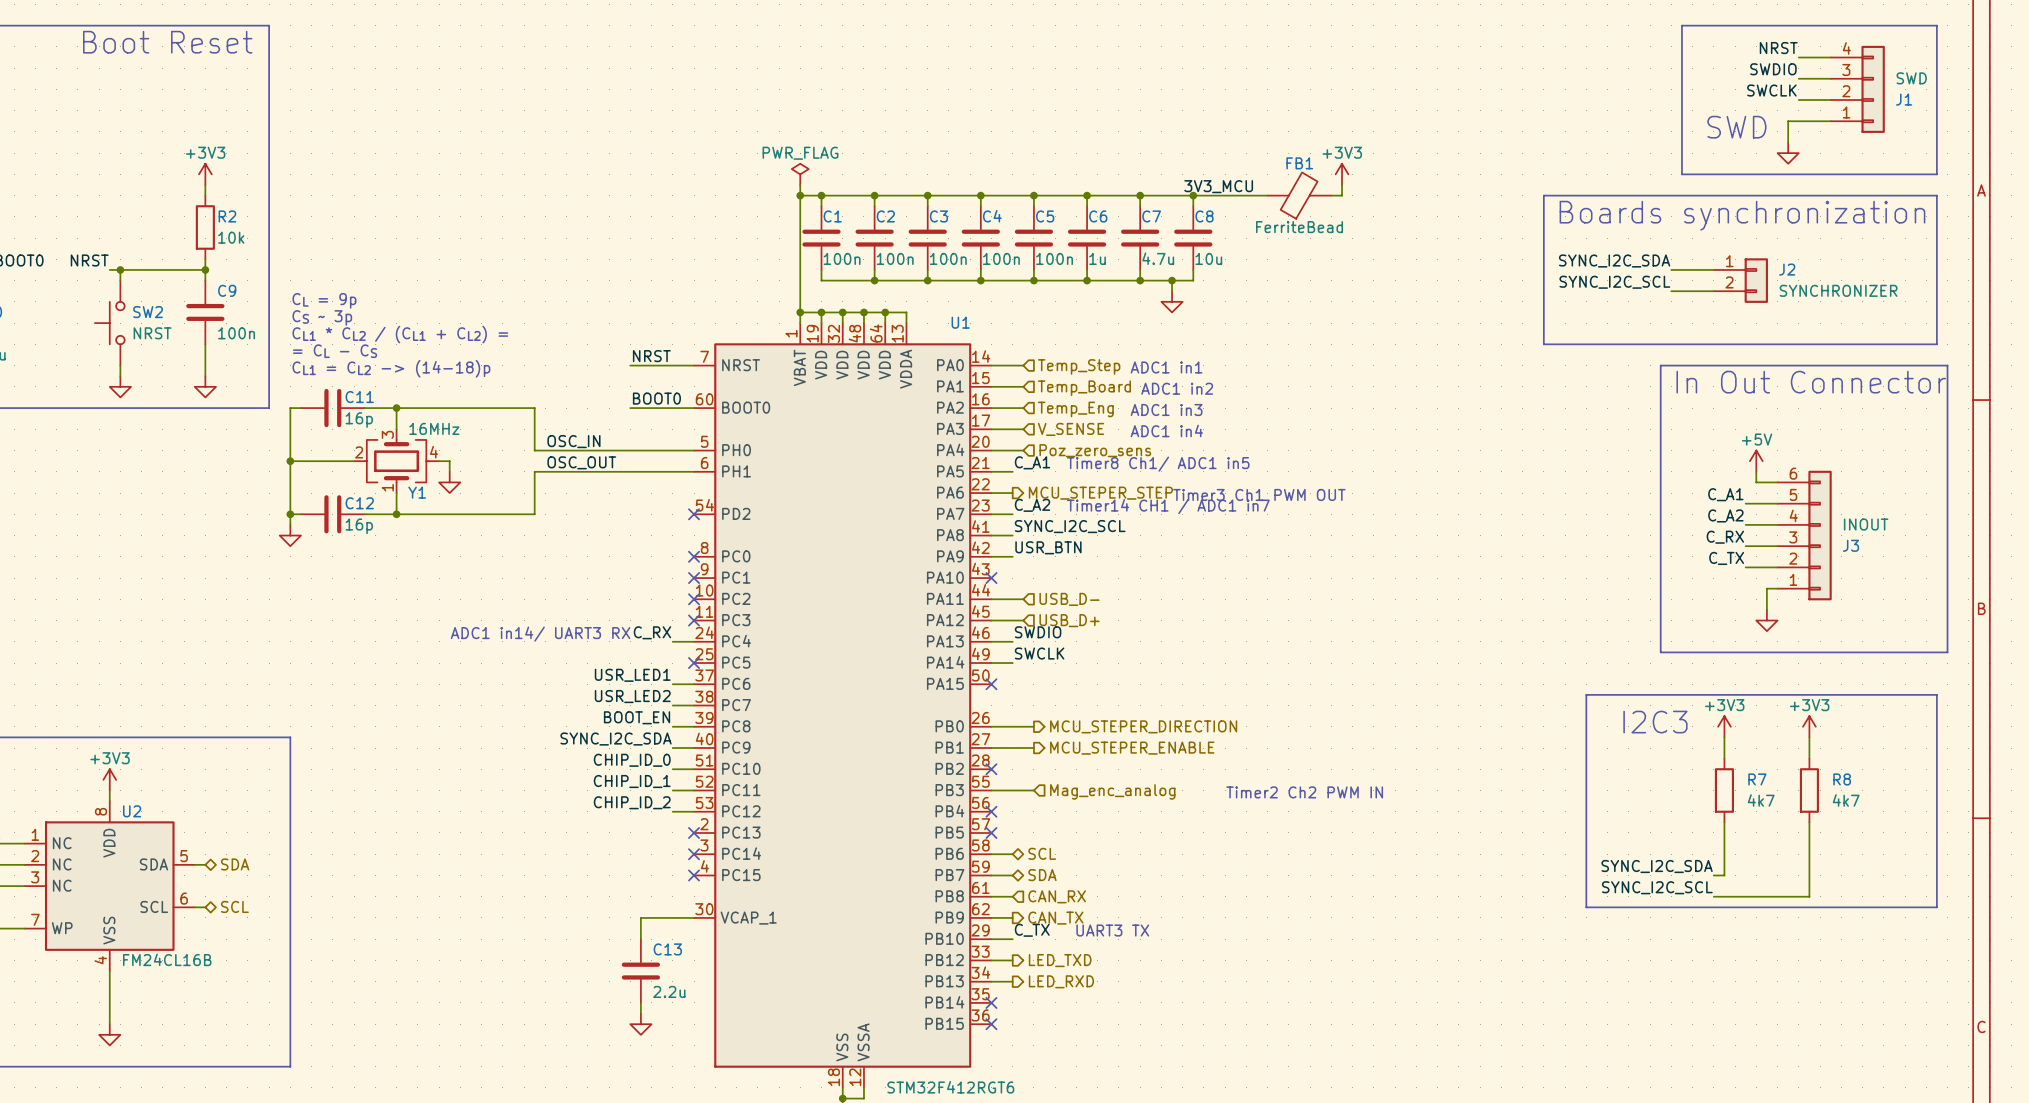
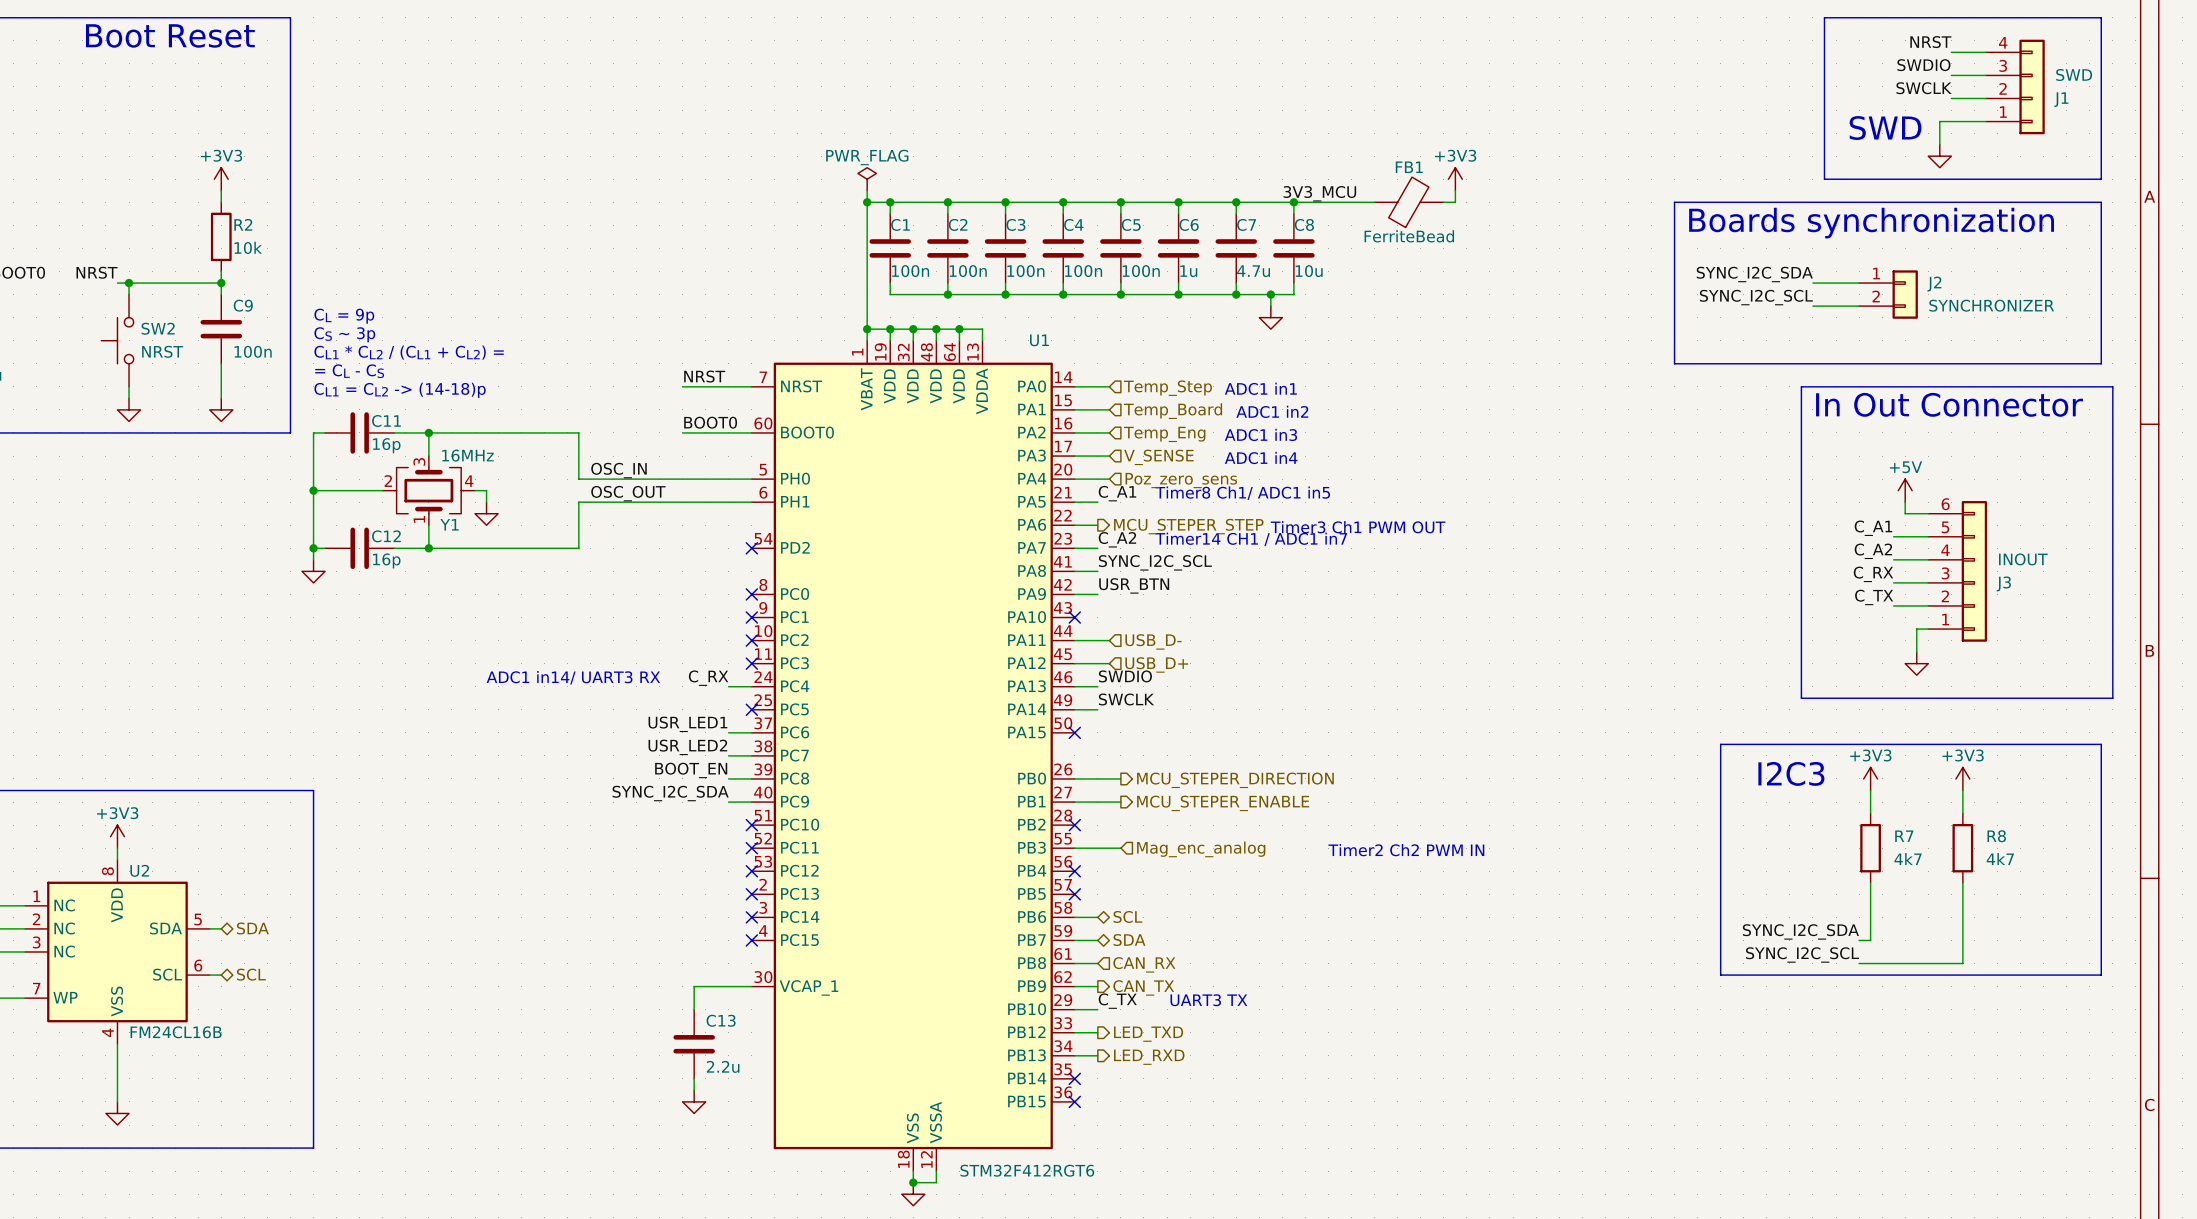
label: CHIP_ID_0 (632, 760) -> none
wire: (672, 769) (694, 769) -> none
no-connect mark: none -> (751, 825)
label: CHIP_ID_1 (632, 781) -> none
wire: (672, 790) (694, 790) -> none
no-connect mark: none -> (751, 848)
label: CHIP_ID_2 (632, 802) -> none
wire: (672, 811) (694, 811) -> none
no-connect mark: none -> (751, 871)

